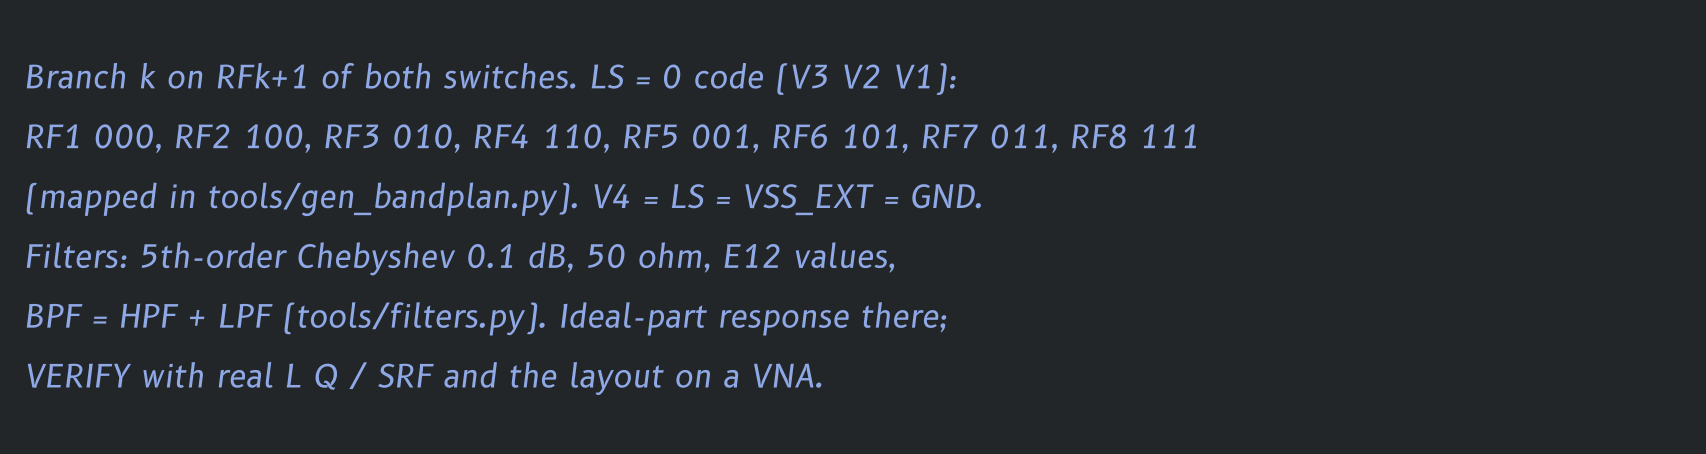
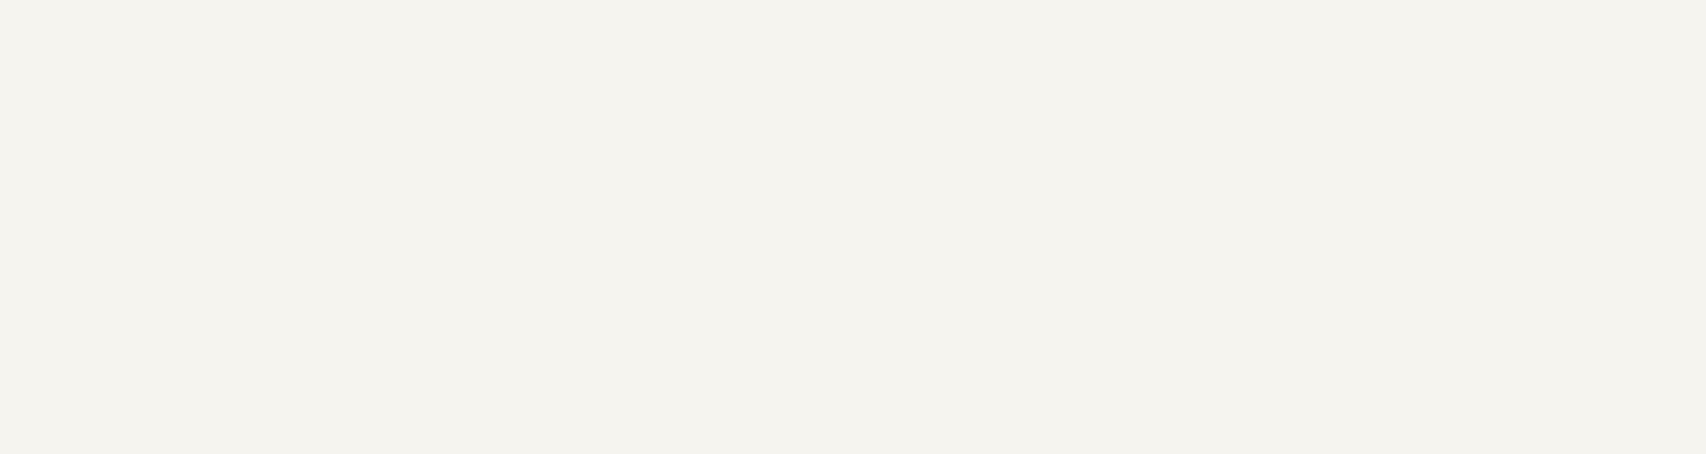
text: Branch k on RFk+1 of both switches. LS = 0 code (V3 V2 V1): (491, 78) -> none
text: RF1 000, RF2 100, RF3 010, RF4 110, RF5 001, RF6 101, RF7 011, RF8 111 (611, 138) -> none
text: (mapped in tools/gen_bandplan.py). V4 = LS = VSS_EXT = GND. (503, 199) -> none
text: Filters: 5th-order Chebyshev 0.1 dB, 50 ohm, E12 values, (460, 258) -> none
text: BPF = HPF + LPF (tools/filters.py). Ideal-part response there; (486, 318) -> none
text: VERIFY with real L Q / SRF and the layout on a VNA. (424, 378) -> none

